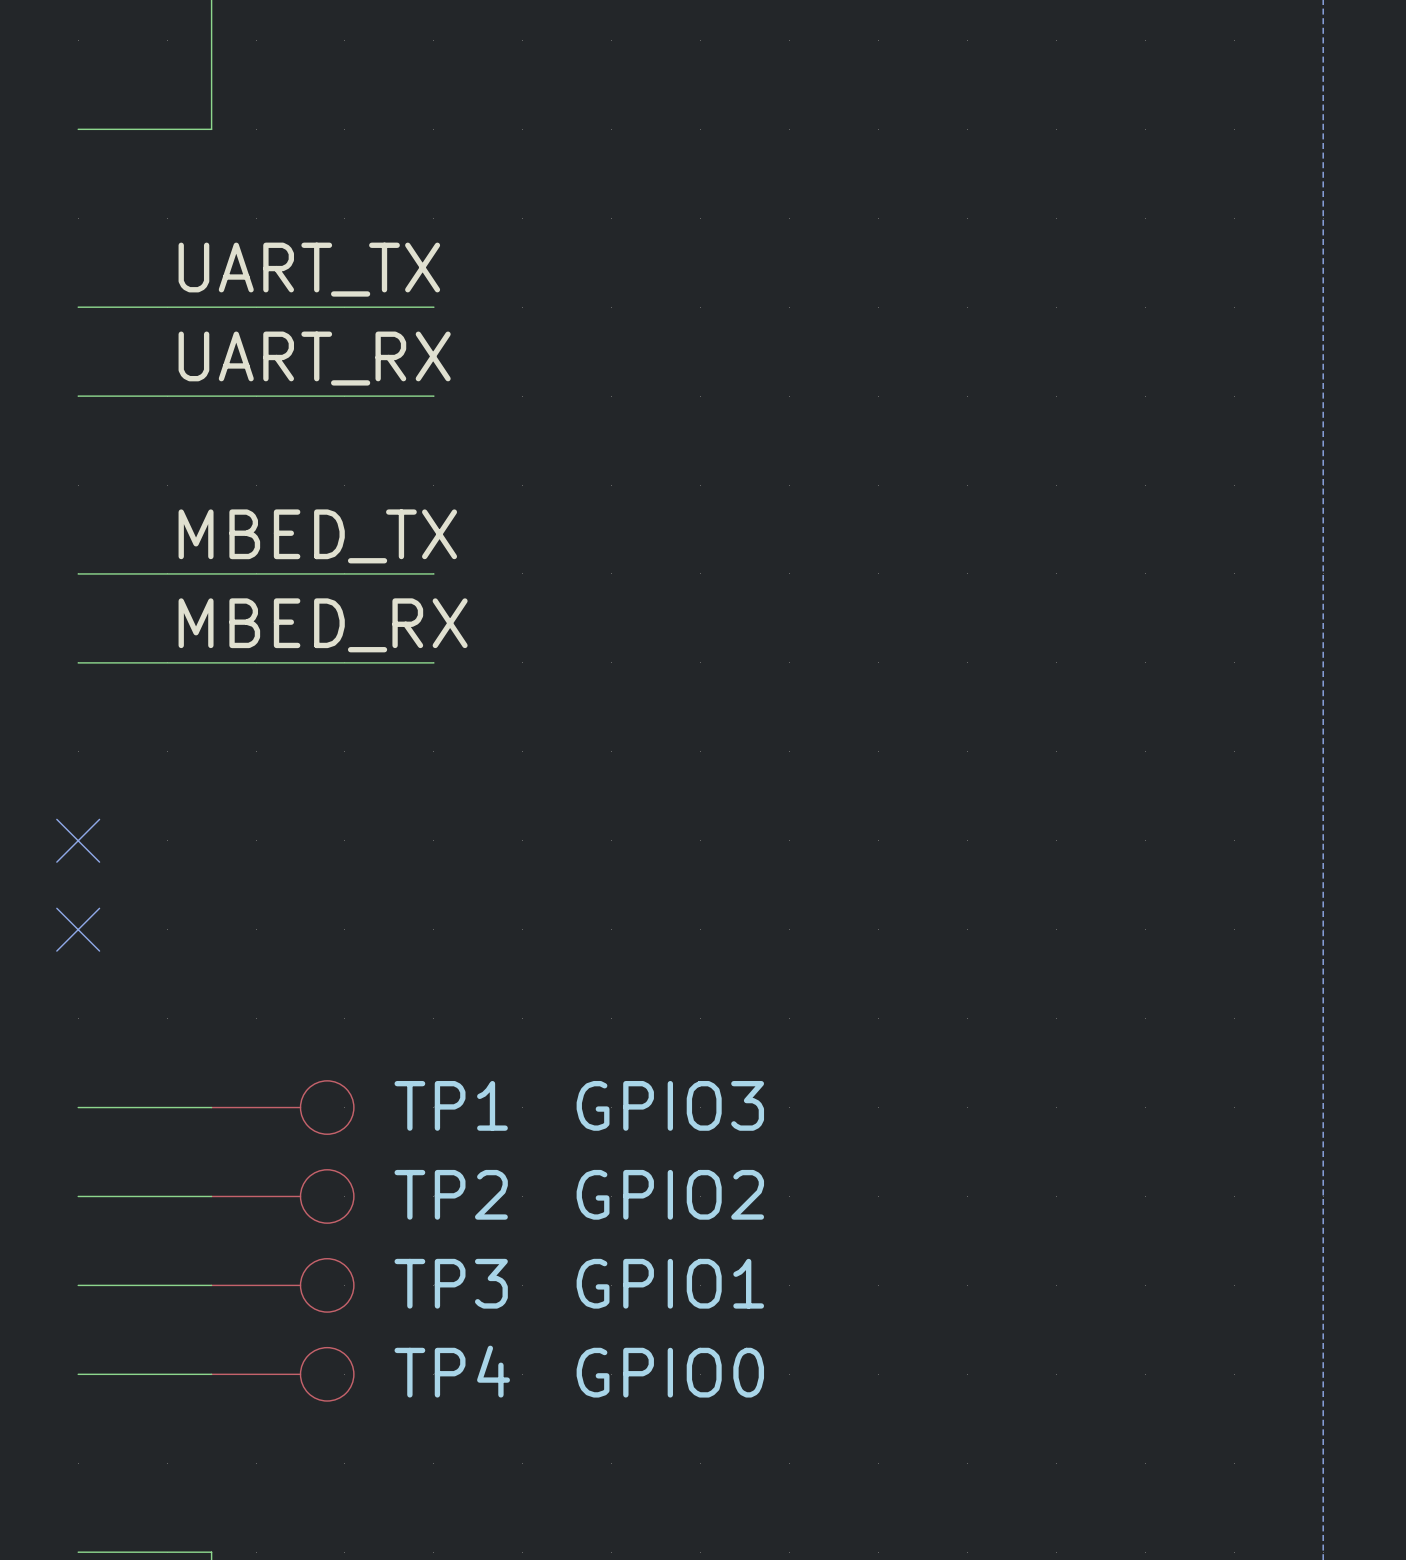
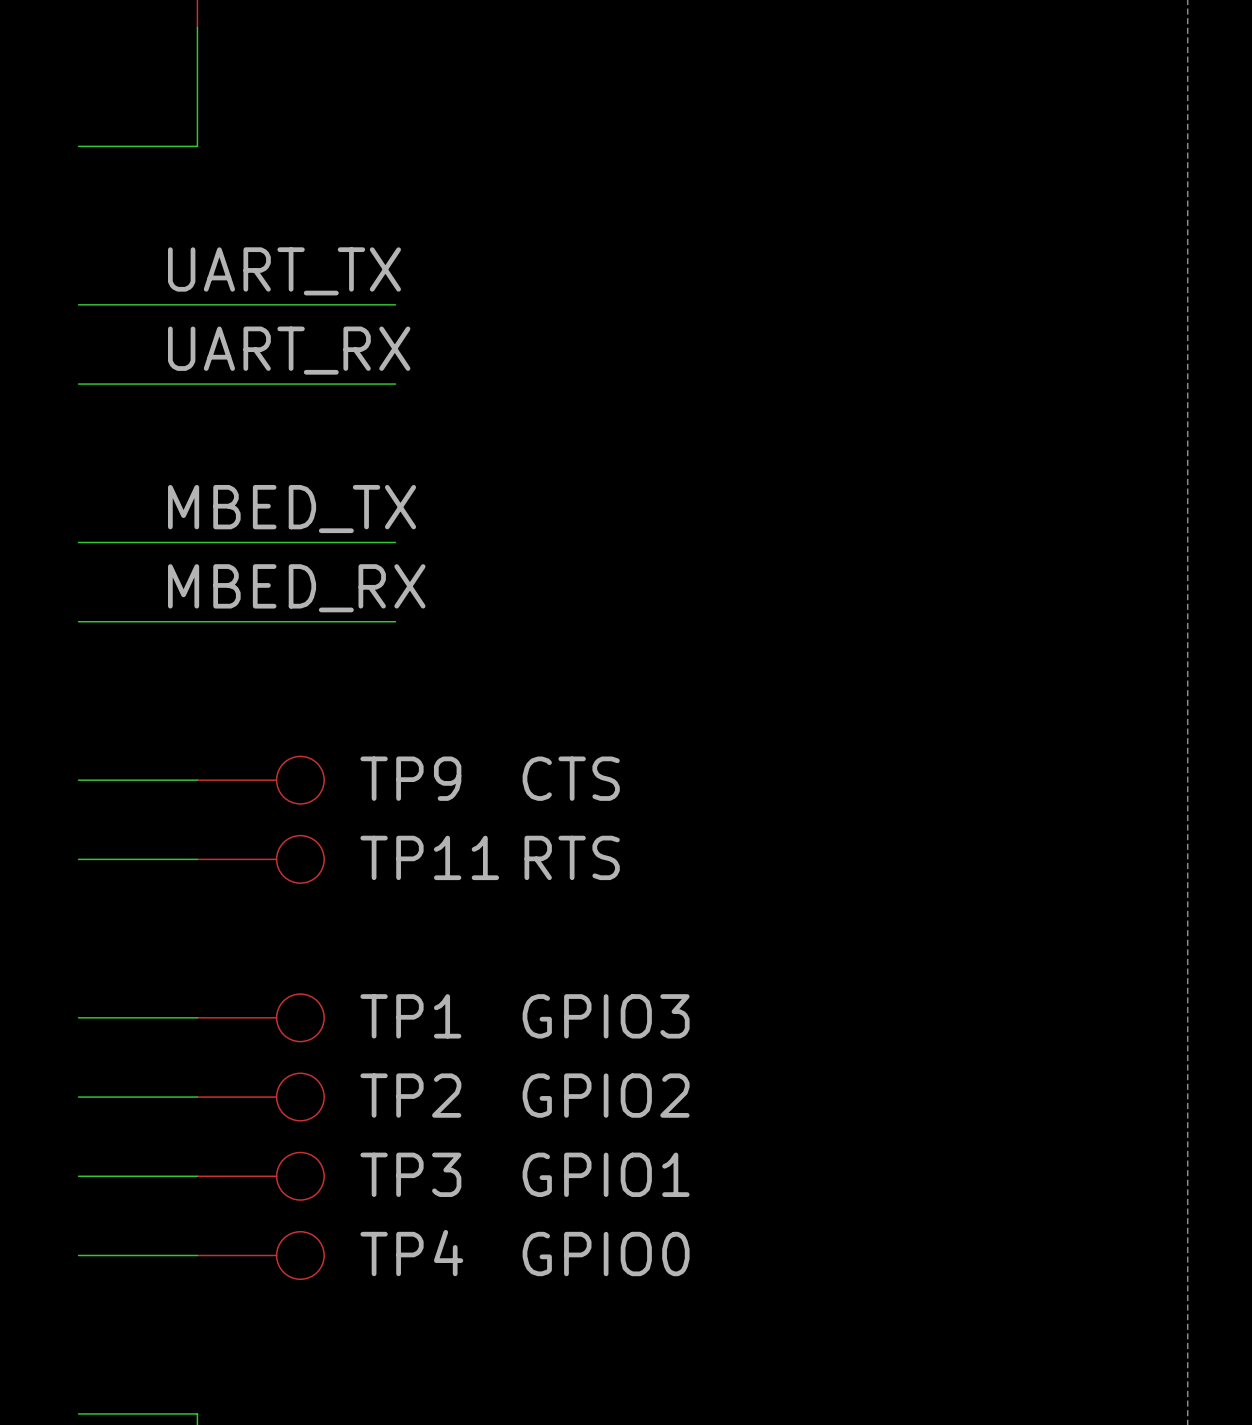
wire: none -> (78, 780) (197, 780)
no-connect mark: (78, 840) -> none
TP9: none -> CTS (260, 780)
wire: none -> (78, 859) (197, 859)
no-connect mark: (78, 929) -> none
TP11: none -> RTS (260, 859)

